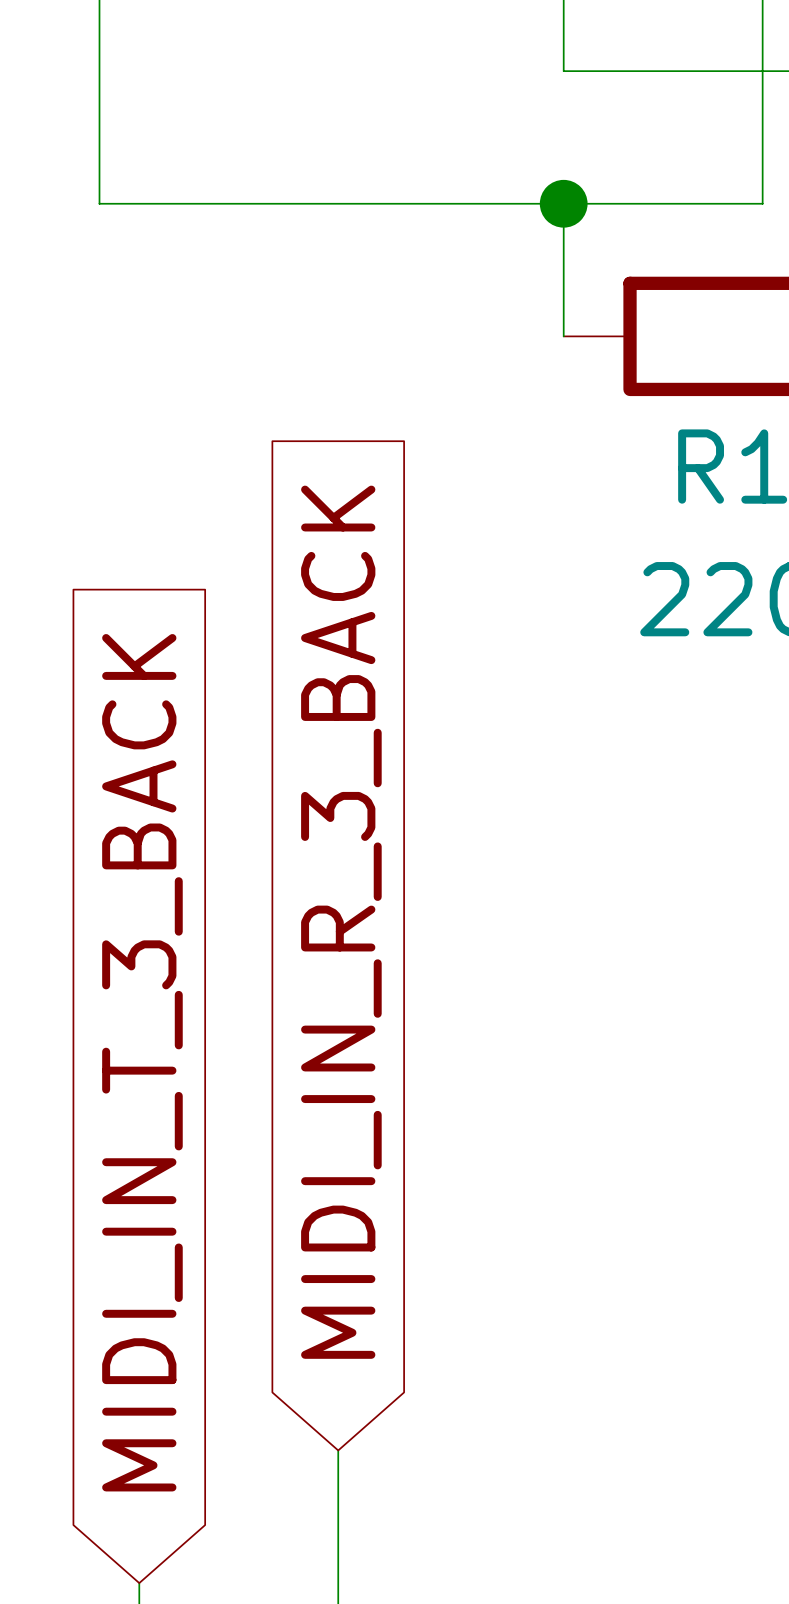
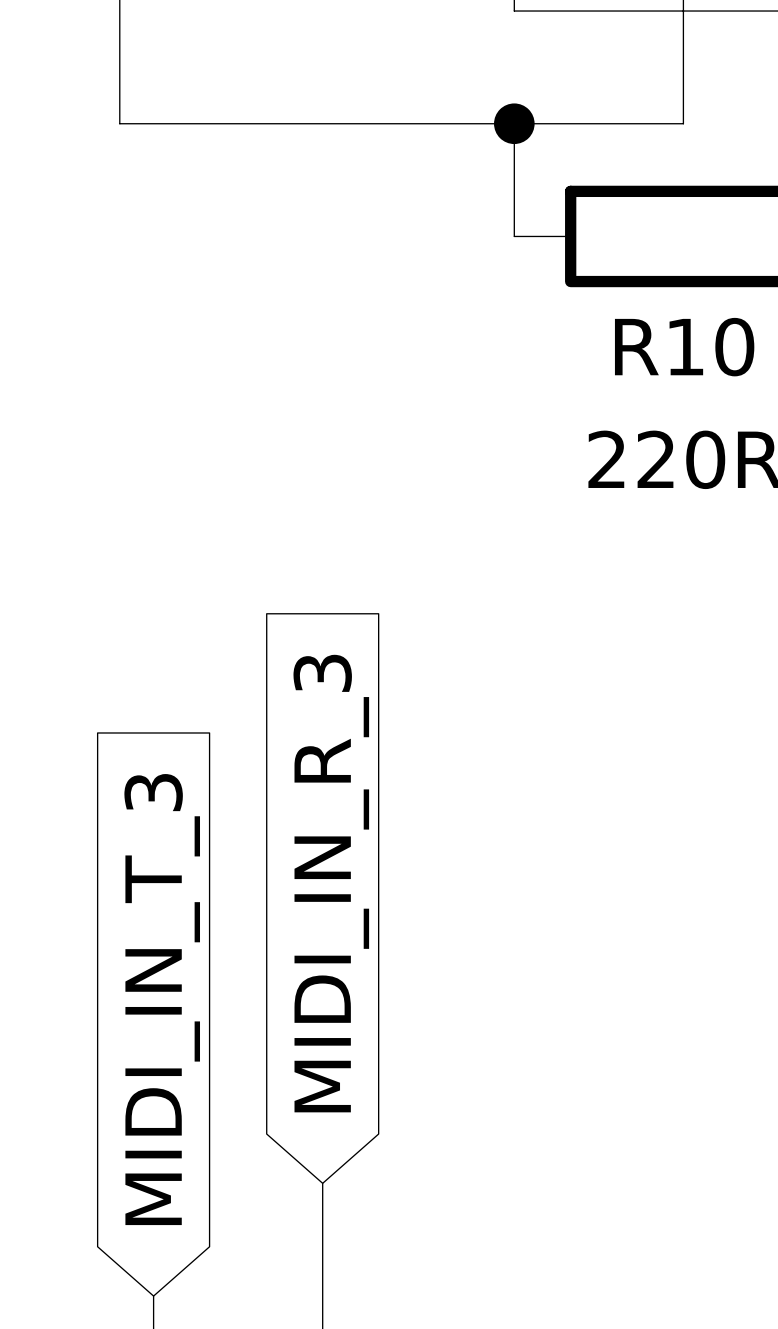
global label: MIDI_IN_R_3_BACK (341, 922) -> MIDI_IN_R_3 (331, 883)
global label: MIDI_IN_T_3_BACK (142, 1062) -> MIDI_IN_T_3 (162, 999)

